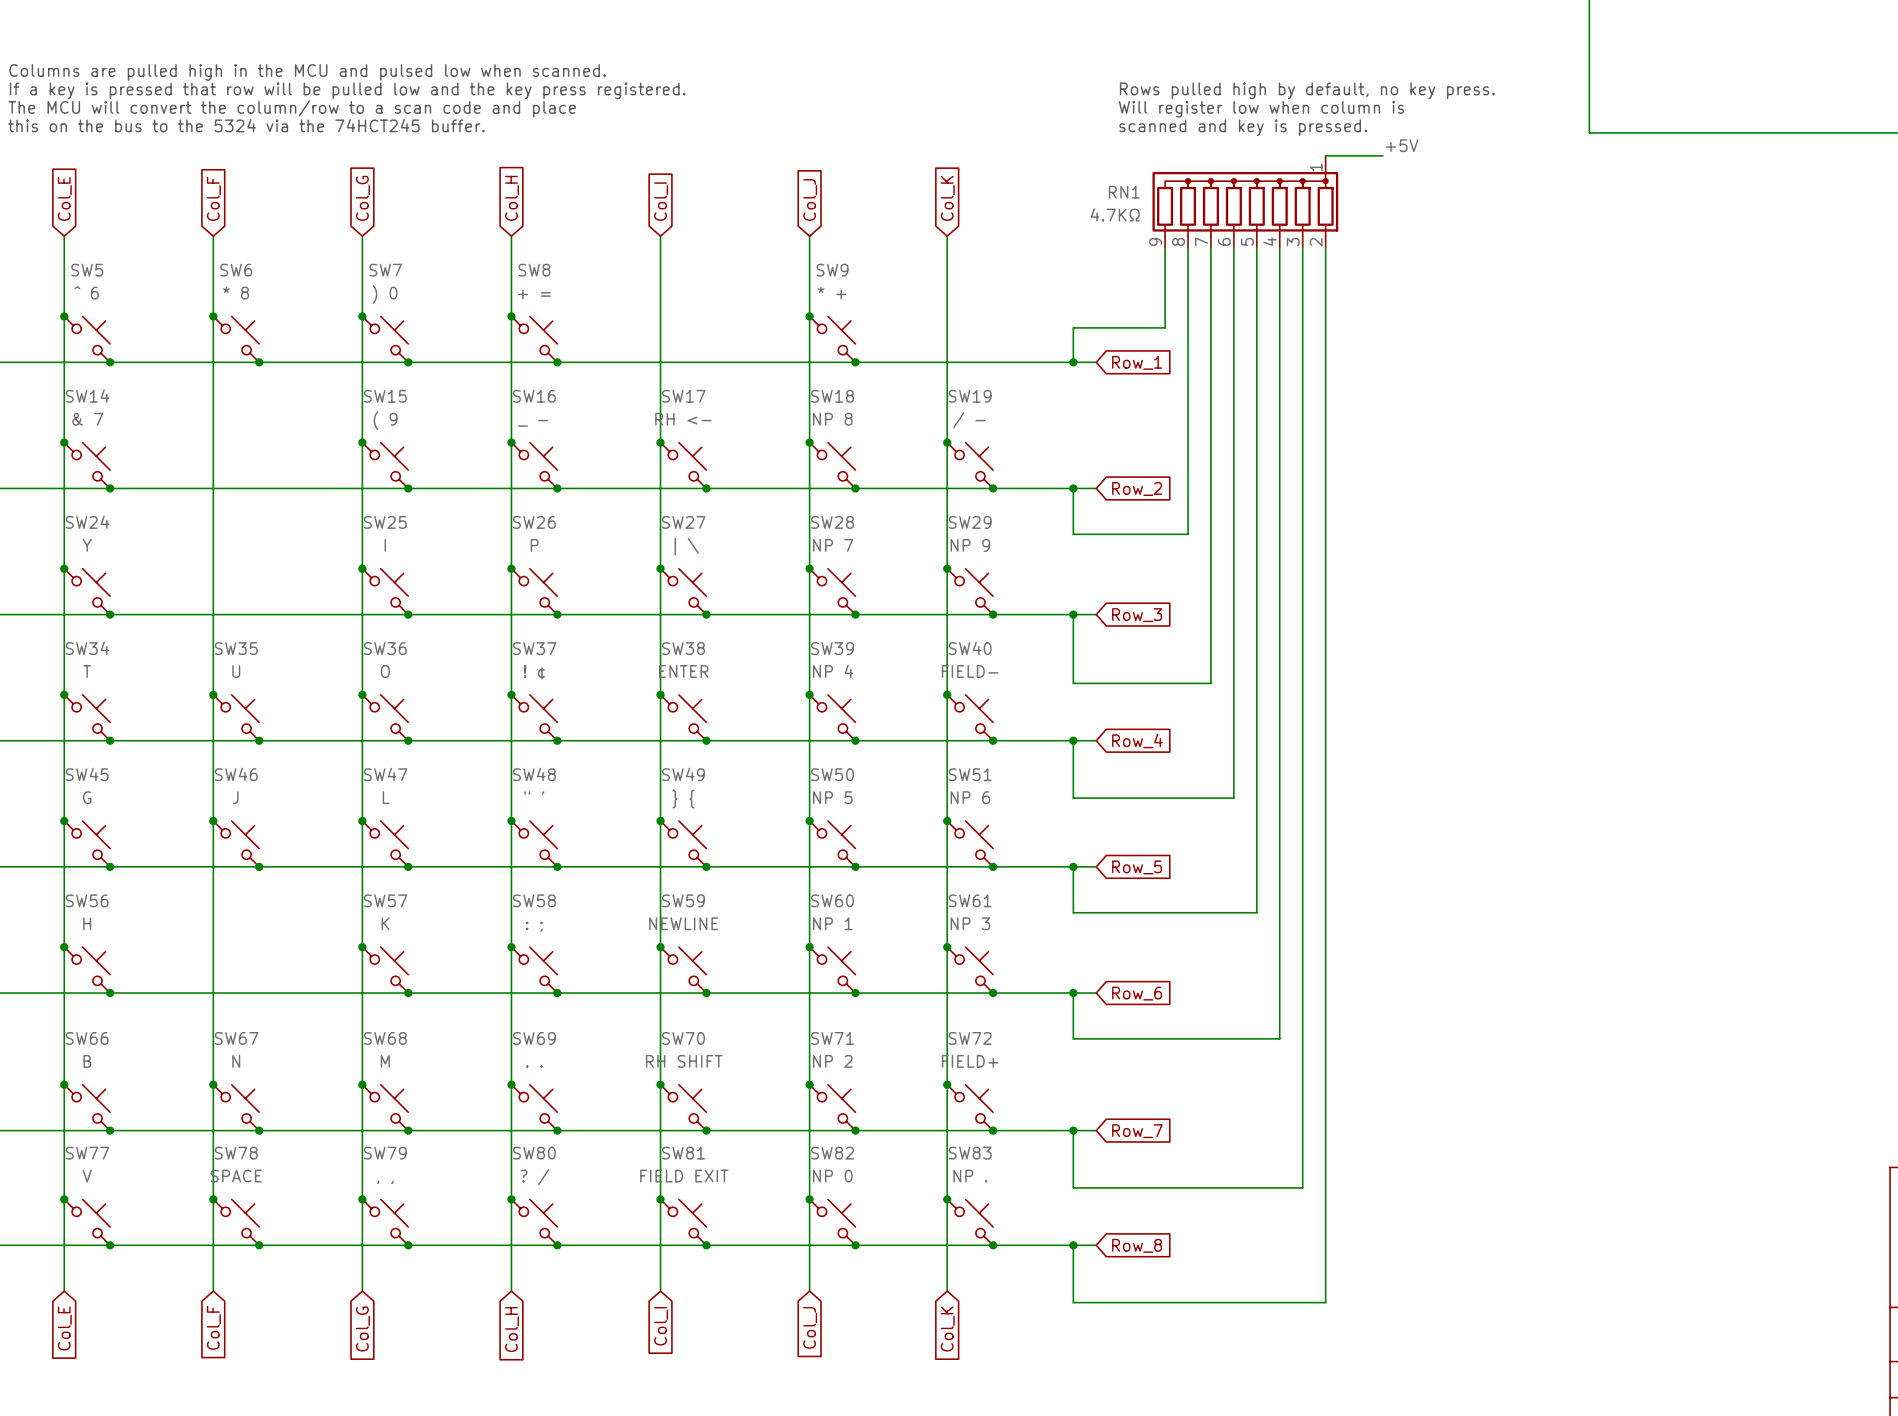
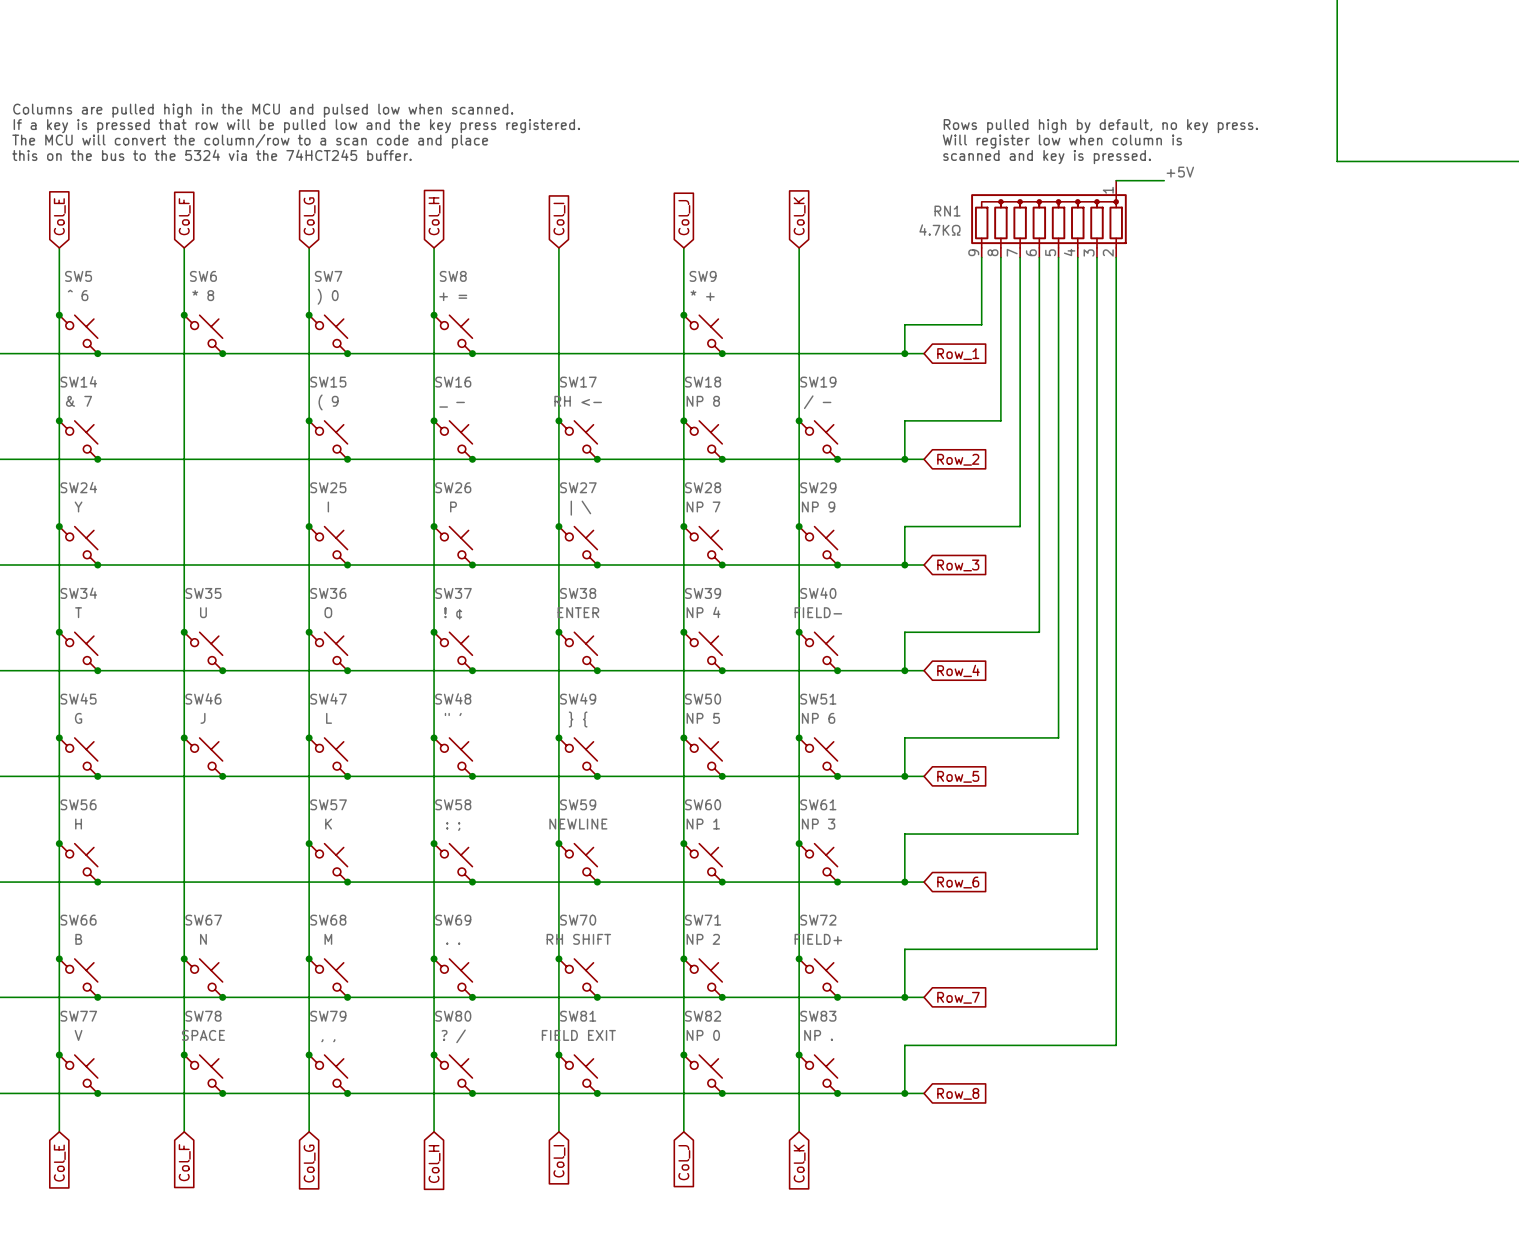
wire: (1188, 442) (1188, 534) (1073, 534) (1073, 488) -> (1000, 420) (904, 420) (904, 459)
wire: (1210, 568) (1210, 683) (1073, 683) (1073, 614) -> (1020, 526) (904, 526) (904, 565)
wire: (1233, 694) (1233, 798) (1073, 798) (1073, 740) -> (1039, 632) (904, 632) (904, 670)
wire: (1256, 821) (1256, 912) (1073, 912) (1073, 866) -> (1058, 737) (904, 737) (904, 776)
wire: (1279, 935) (1279, 1038) (1073, 1038) (1073, 993) -> (1077, 834) (904, 834) (904, 882)
wire: (1302, 1073) (1302, 1187) -> (1116, 1045) (1096, 1045)
wire: none -> (1096, 949) (904, 949) (904, 997)
wire: (1073, 1130) (1073, 1187) -> (904, 1093) (904, 1045)
wire: (1325, 1187) (1325, 1302) (1073, 1302) (1073, 1245) -> none

